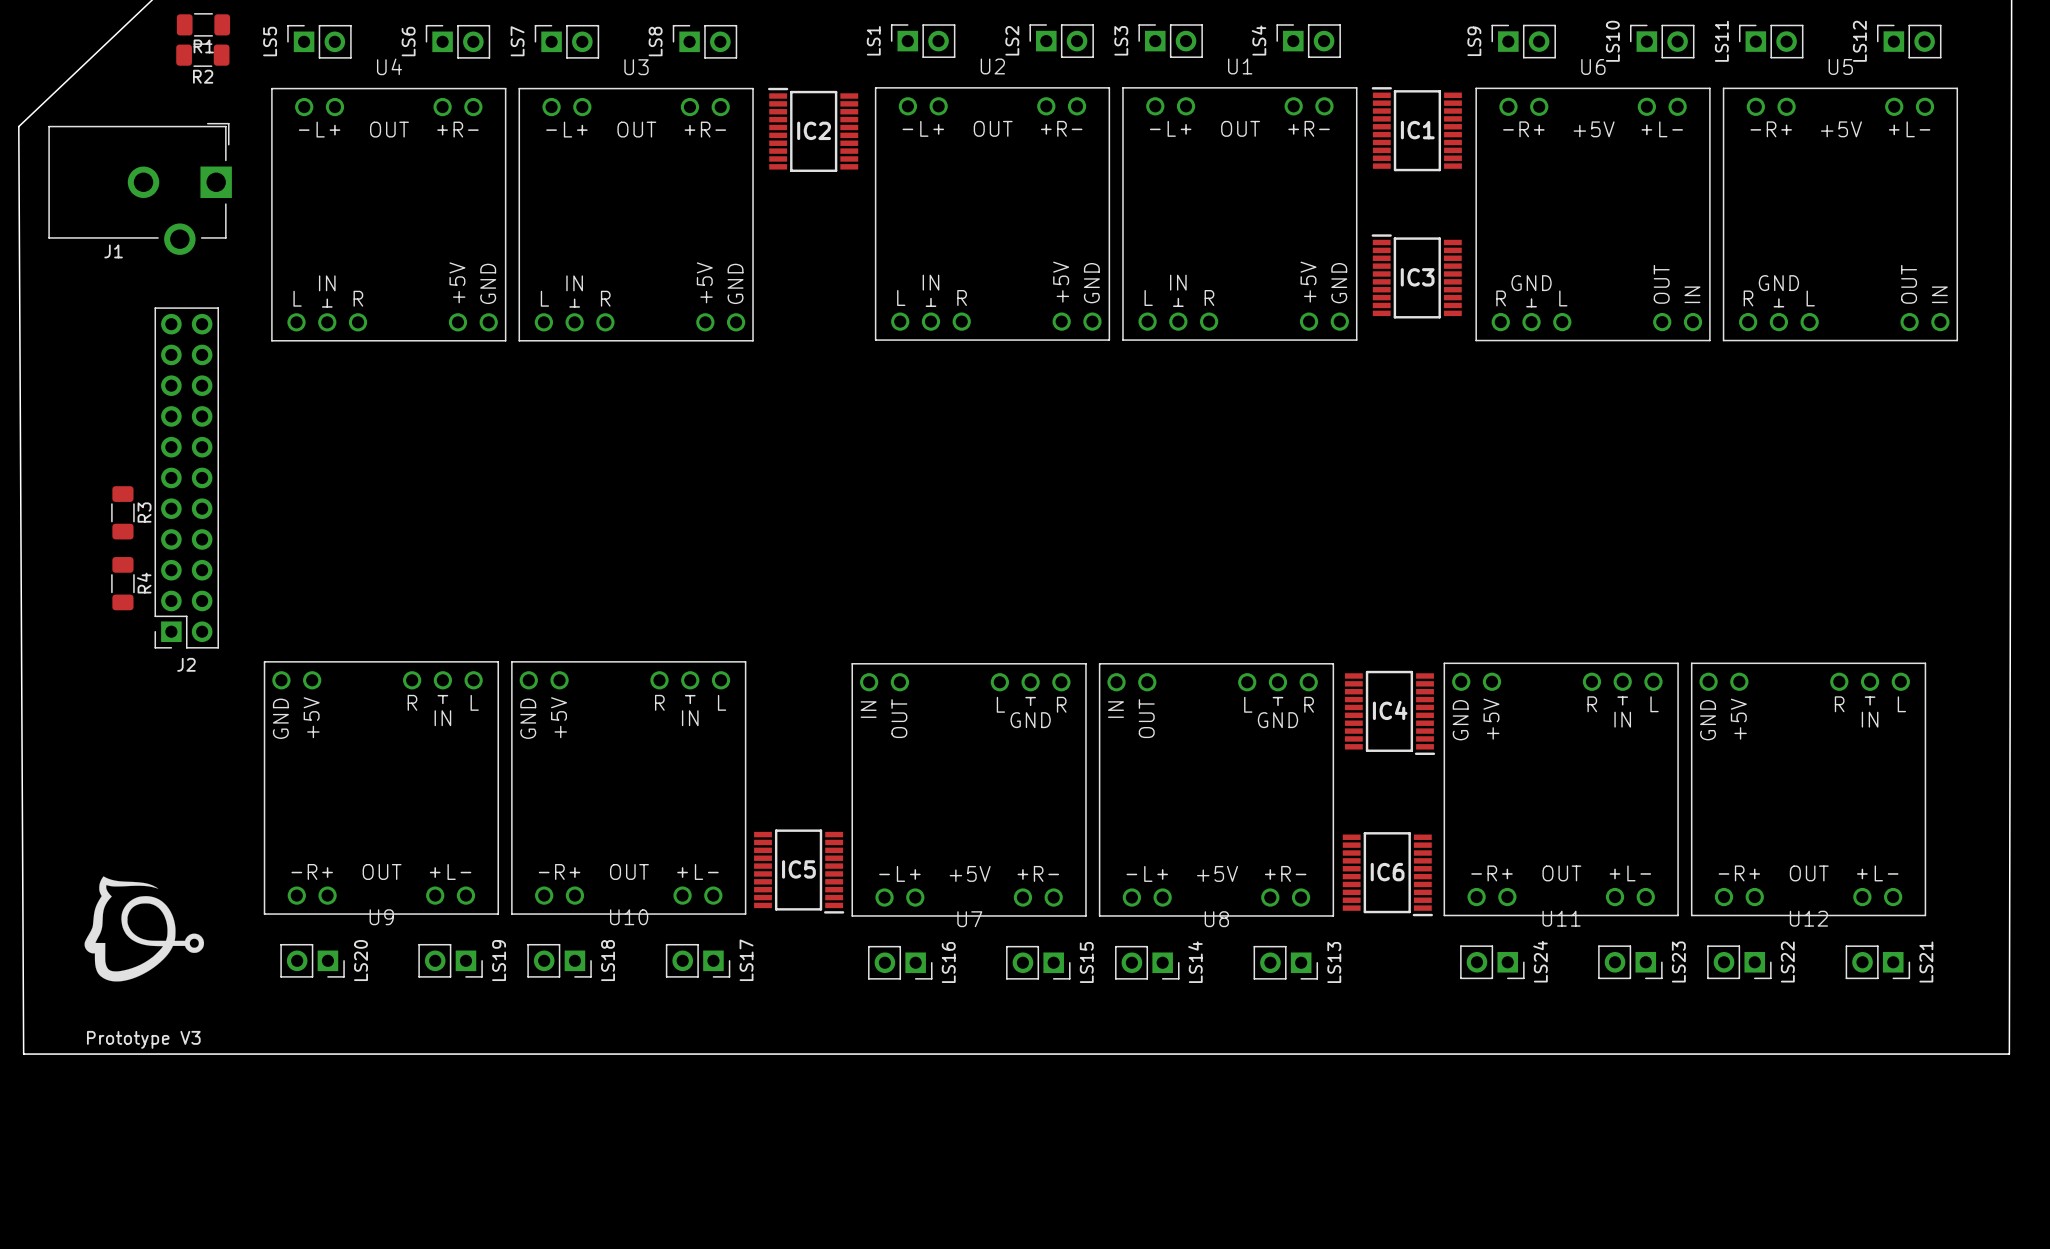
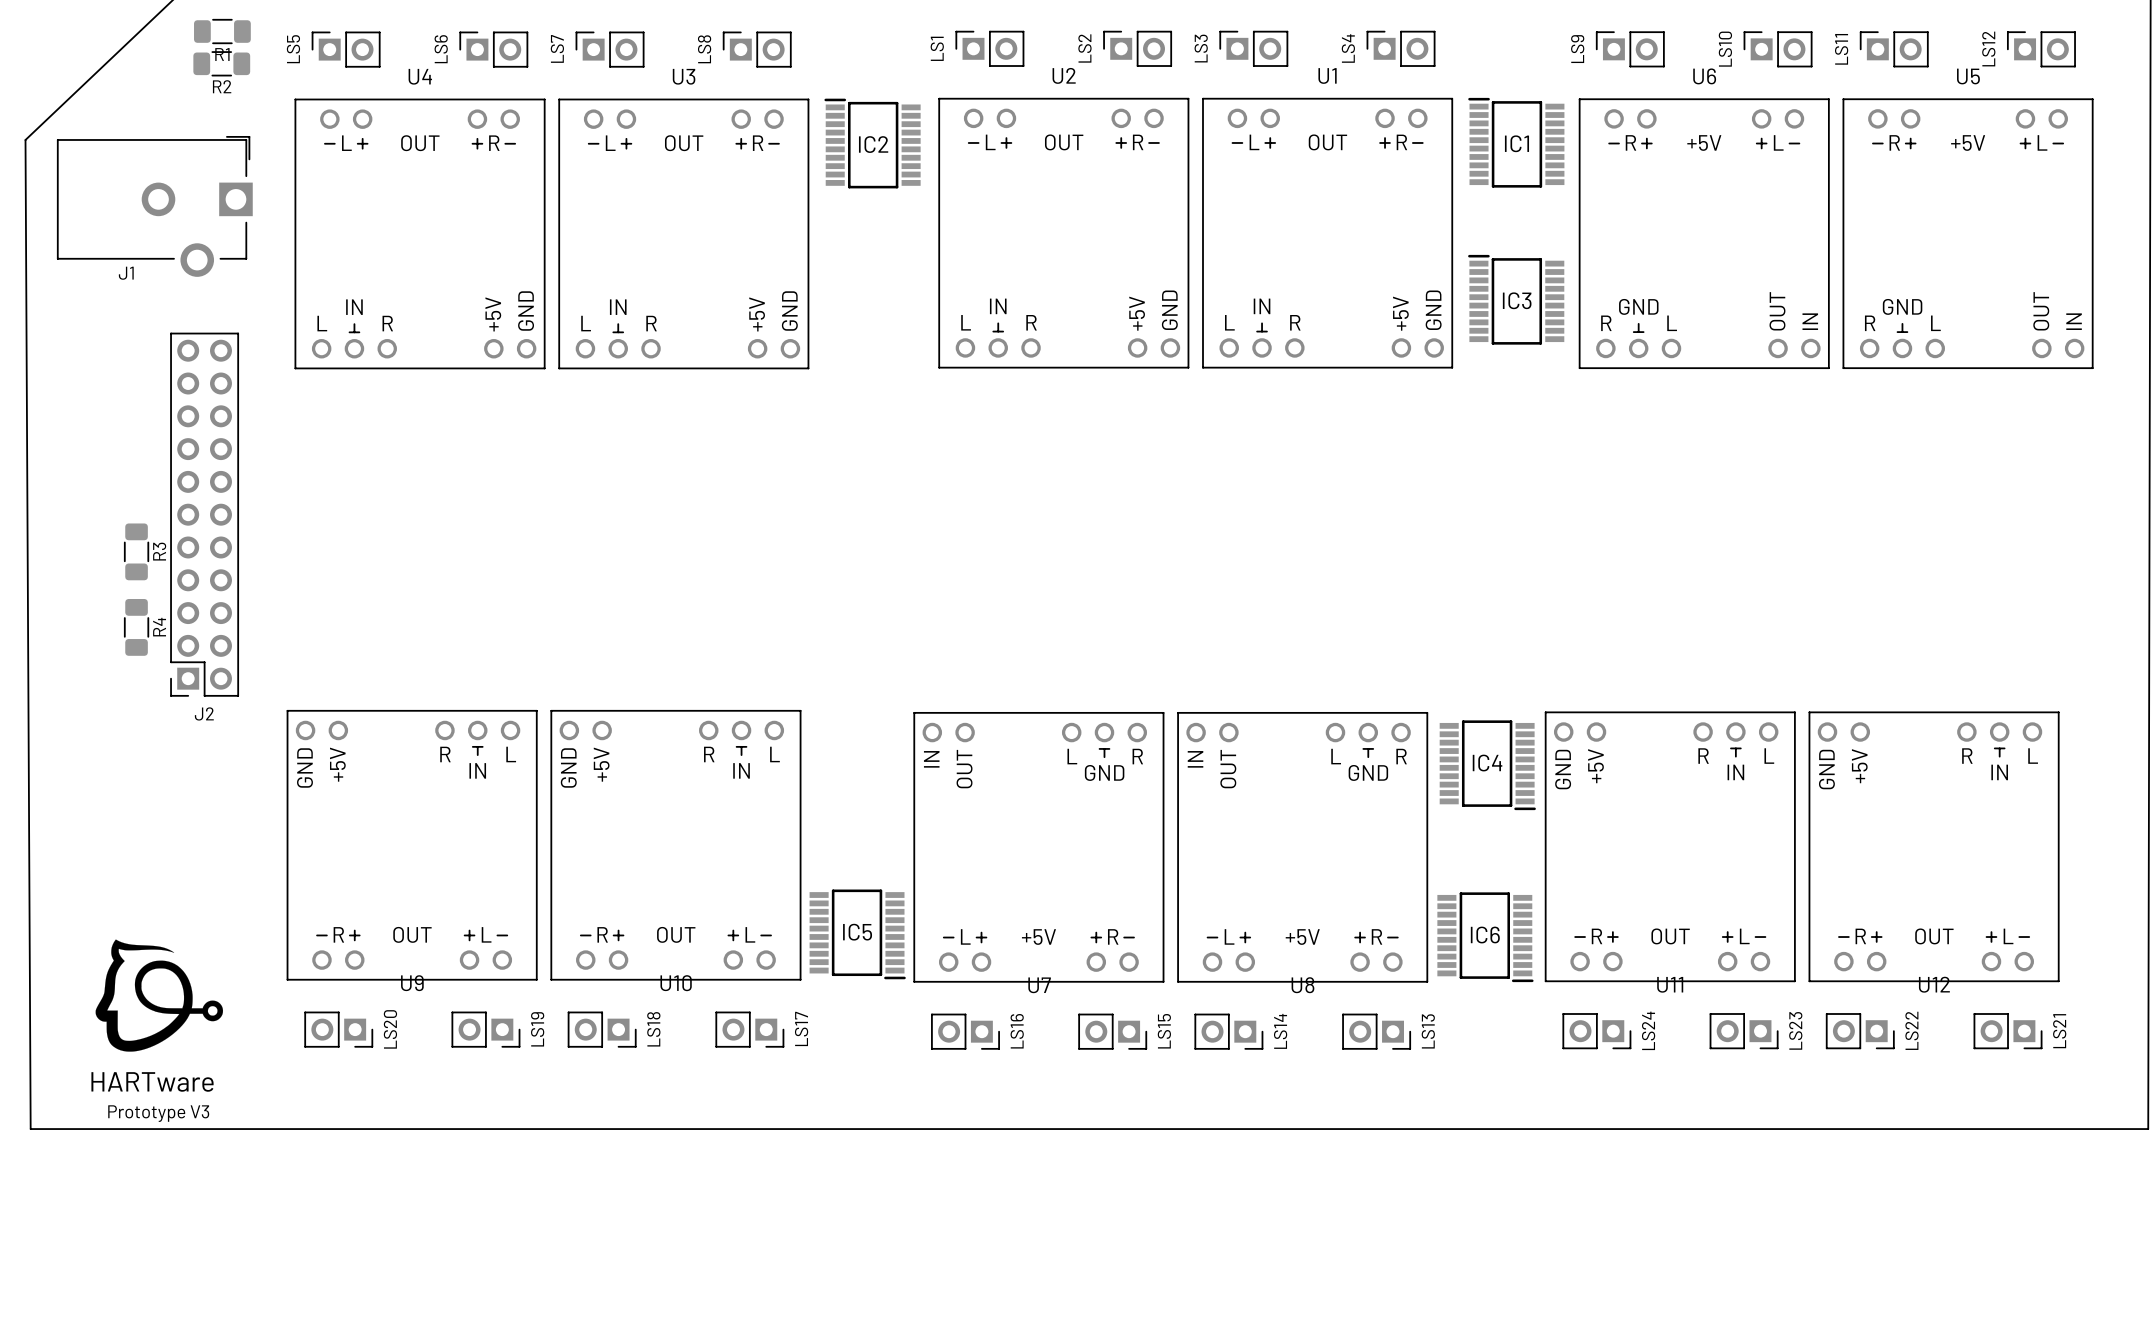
text: none -> HARTware (152, 1081)

